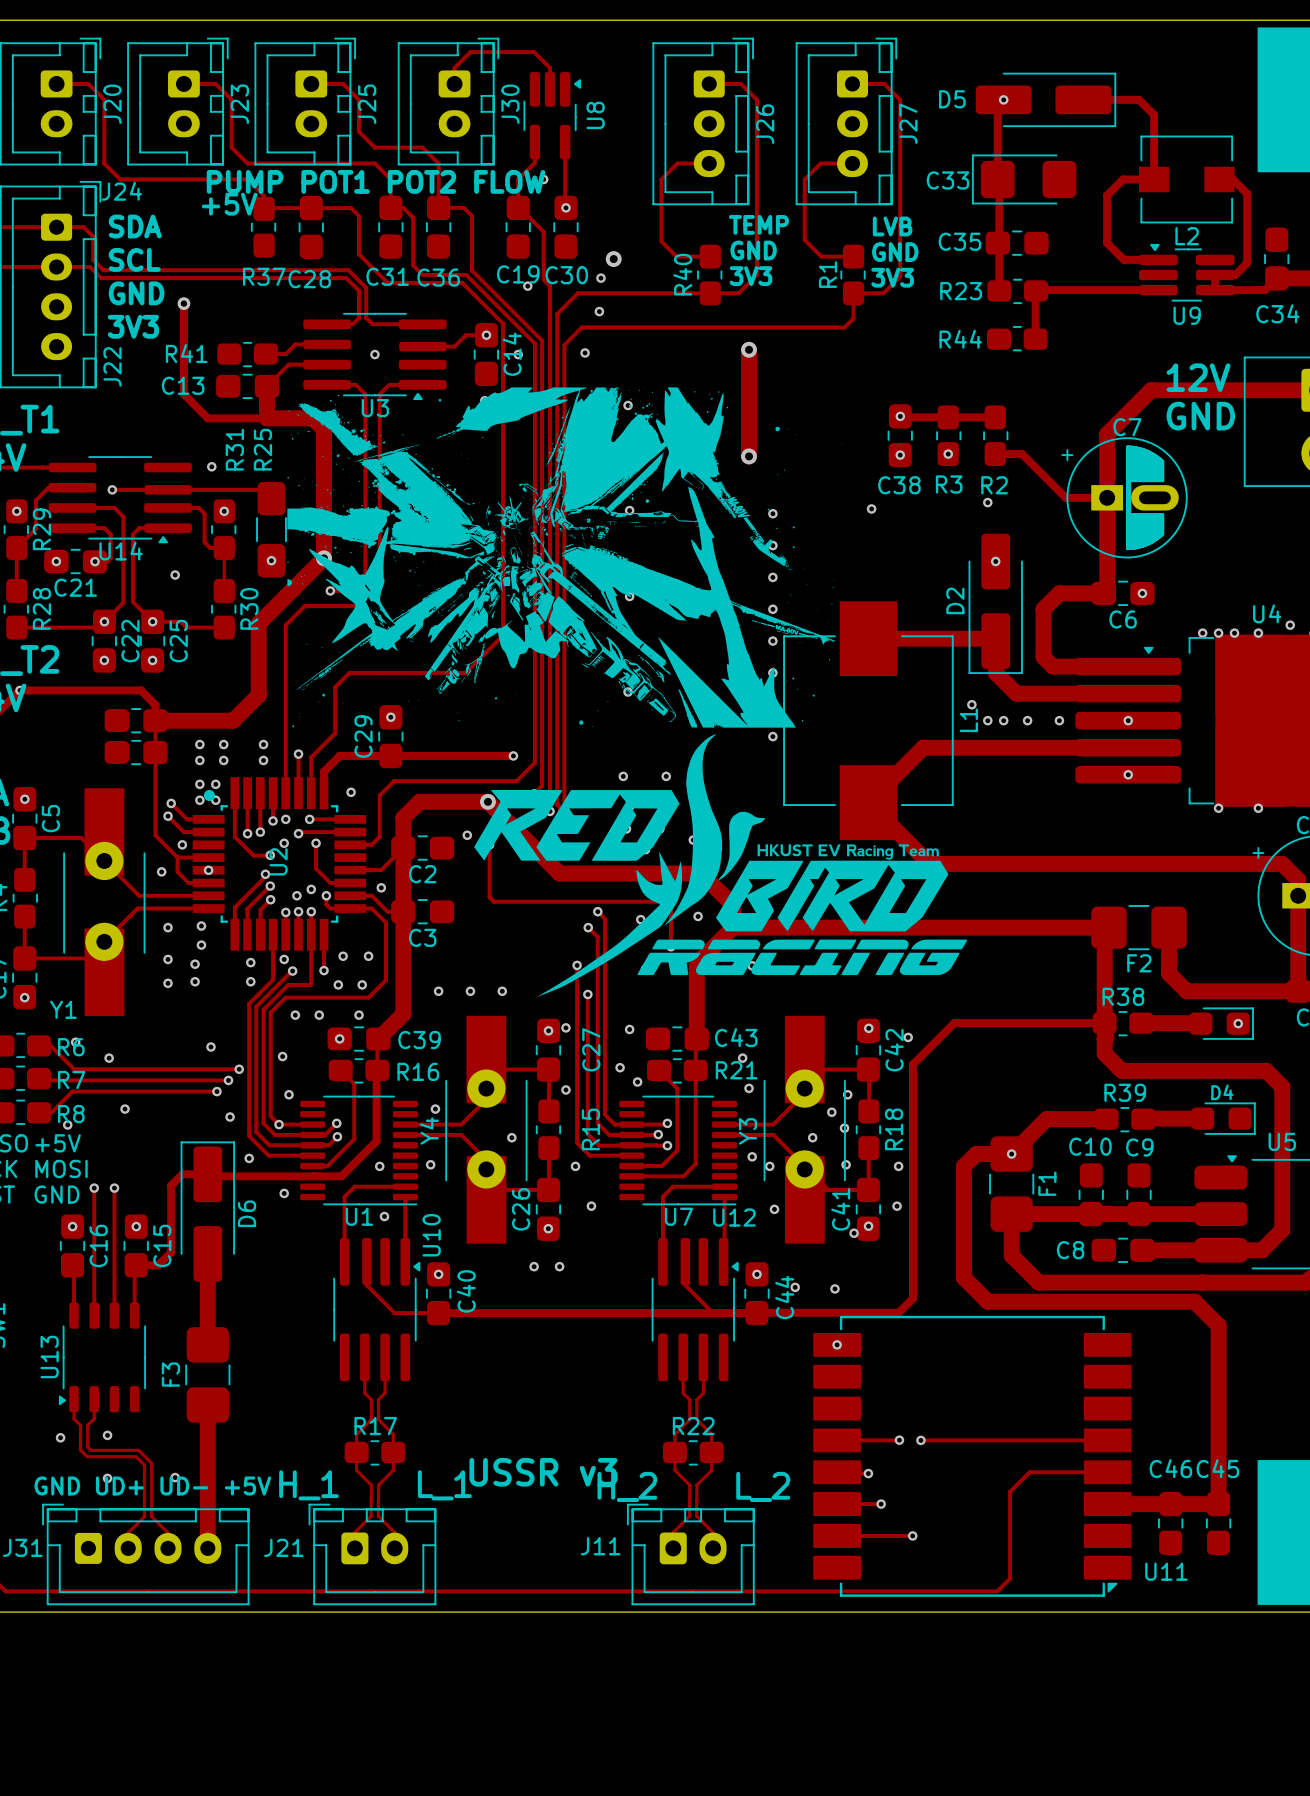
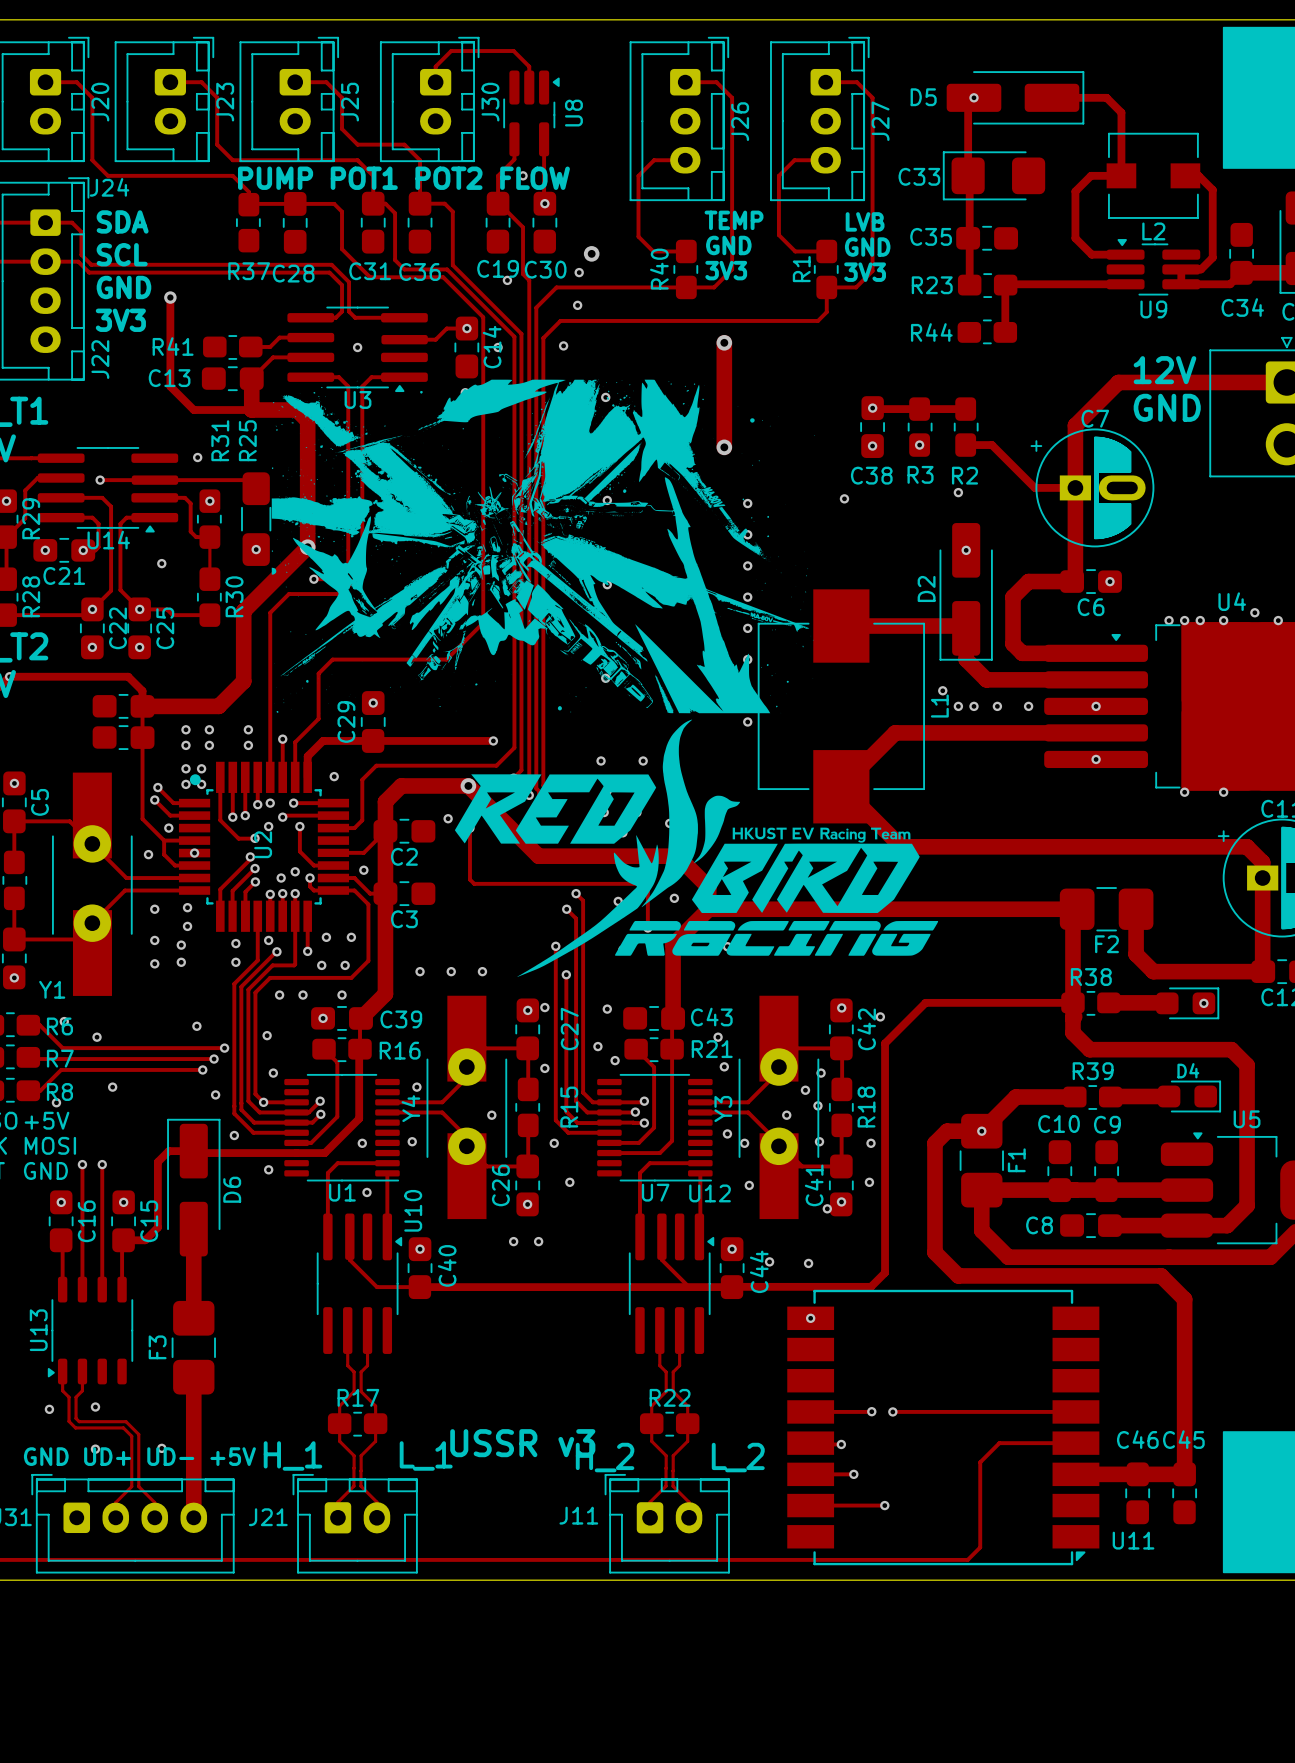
text position: PUMP POT1 POT2 FLOW (376, 181) -> PUMP POT1 POT2 FLOW (403, 178)
text: +5V (229, 204) -> none

